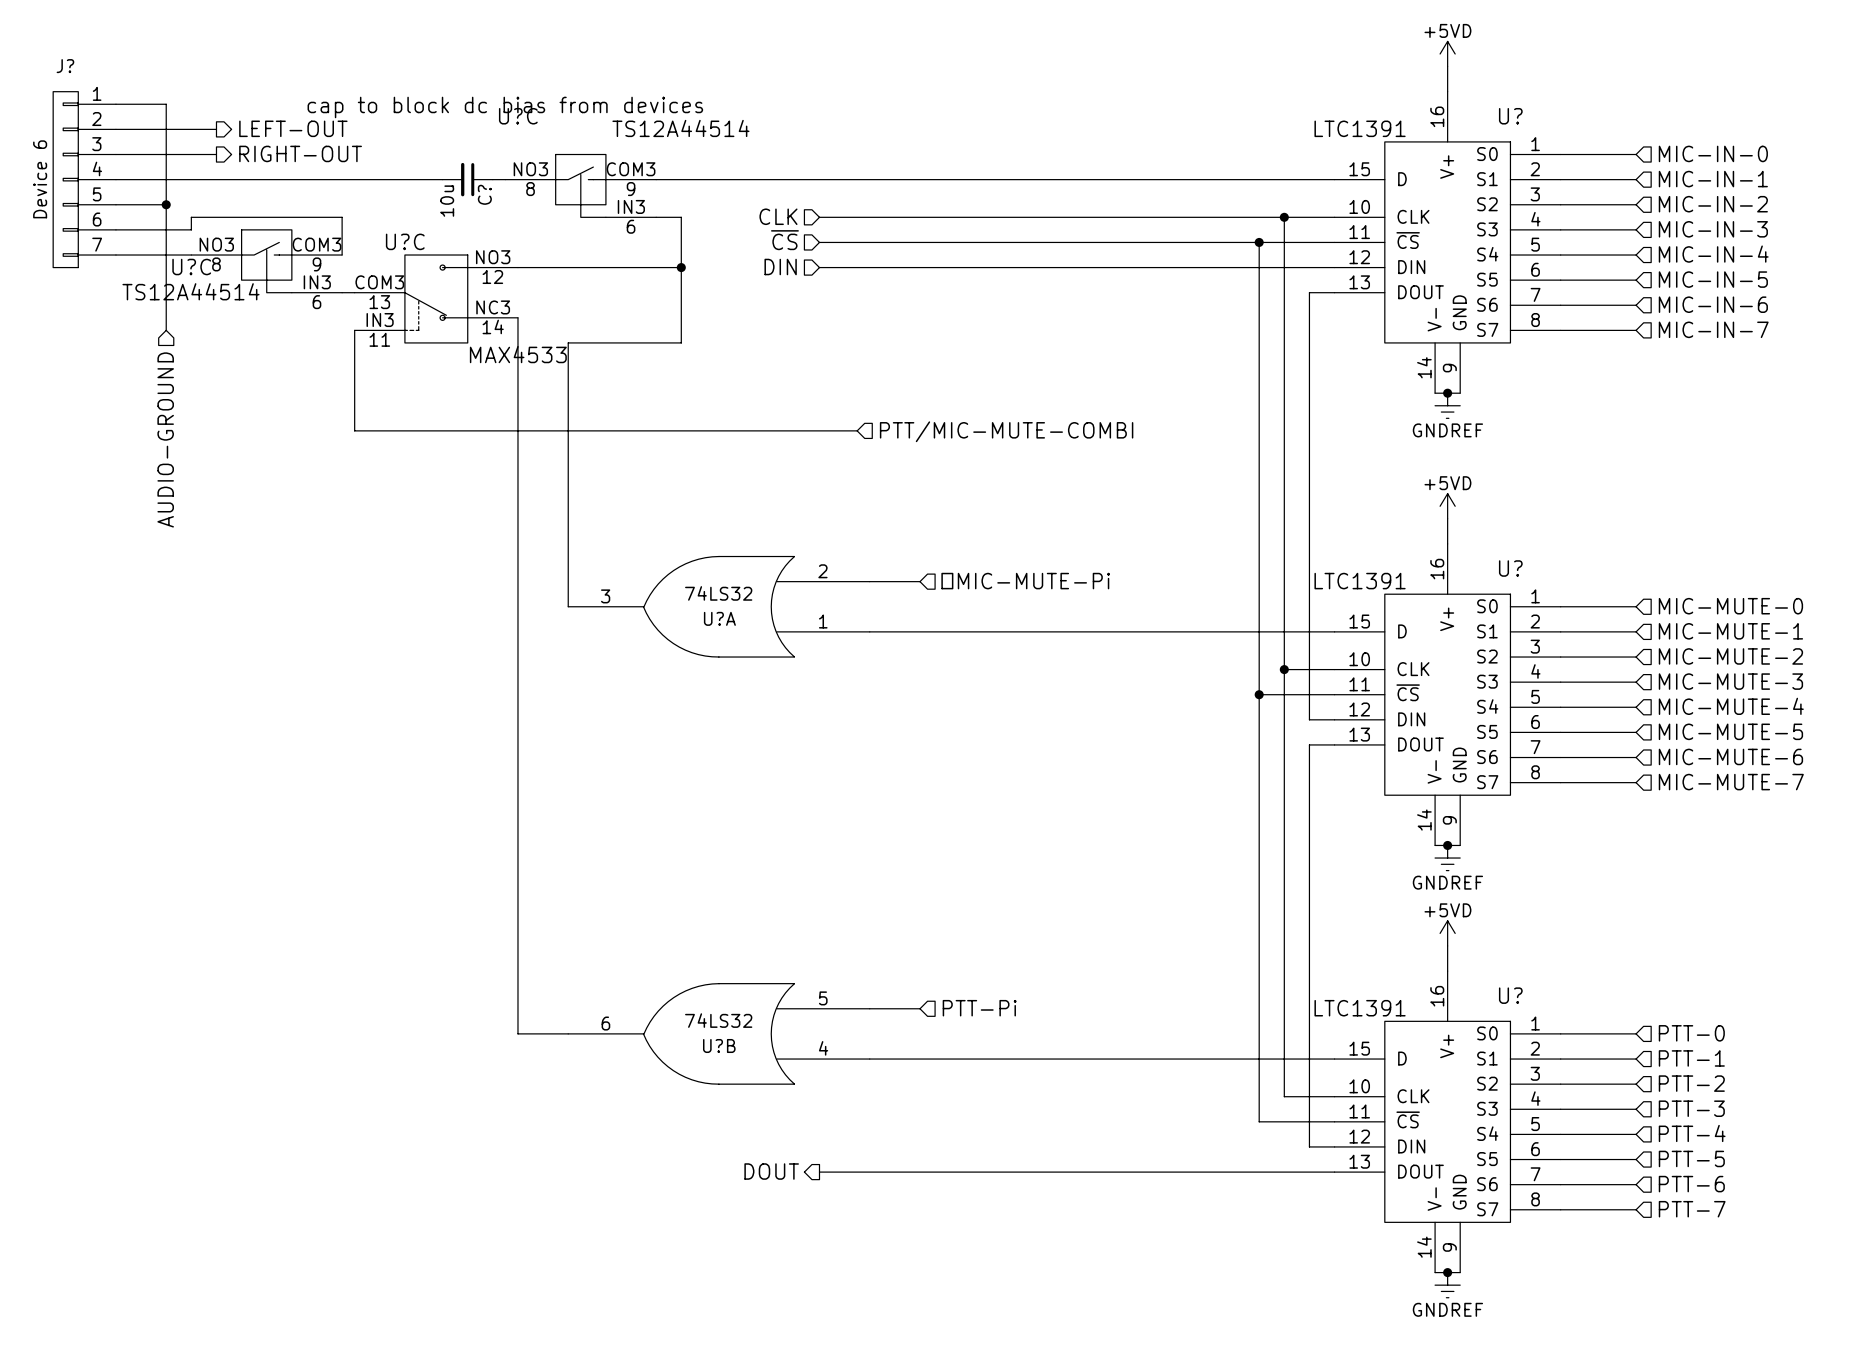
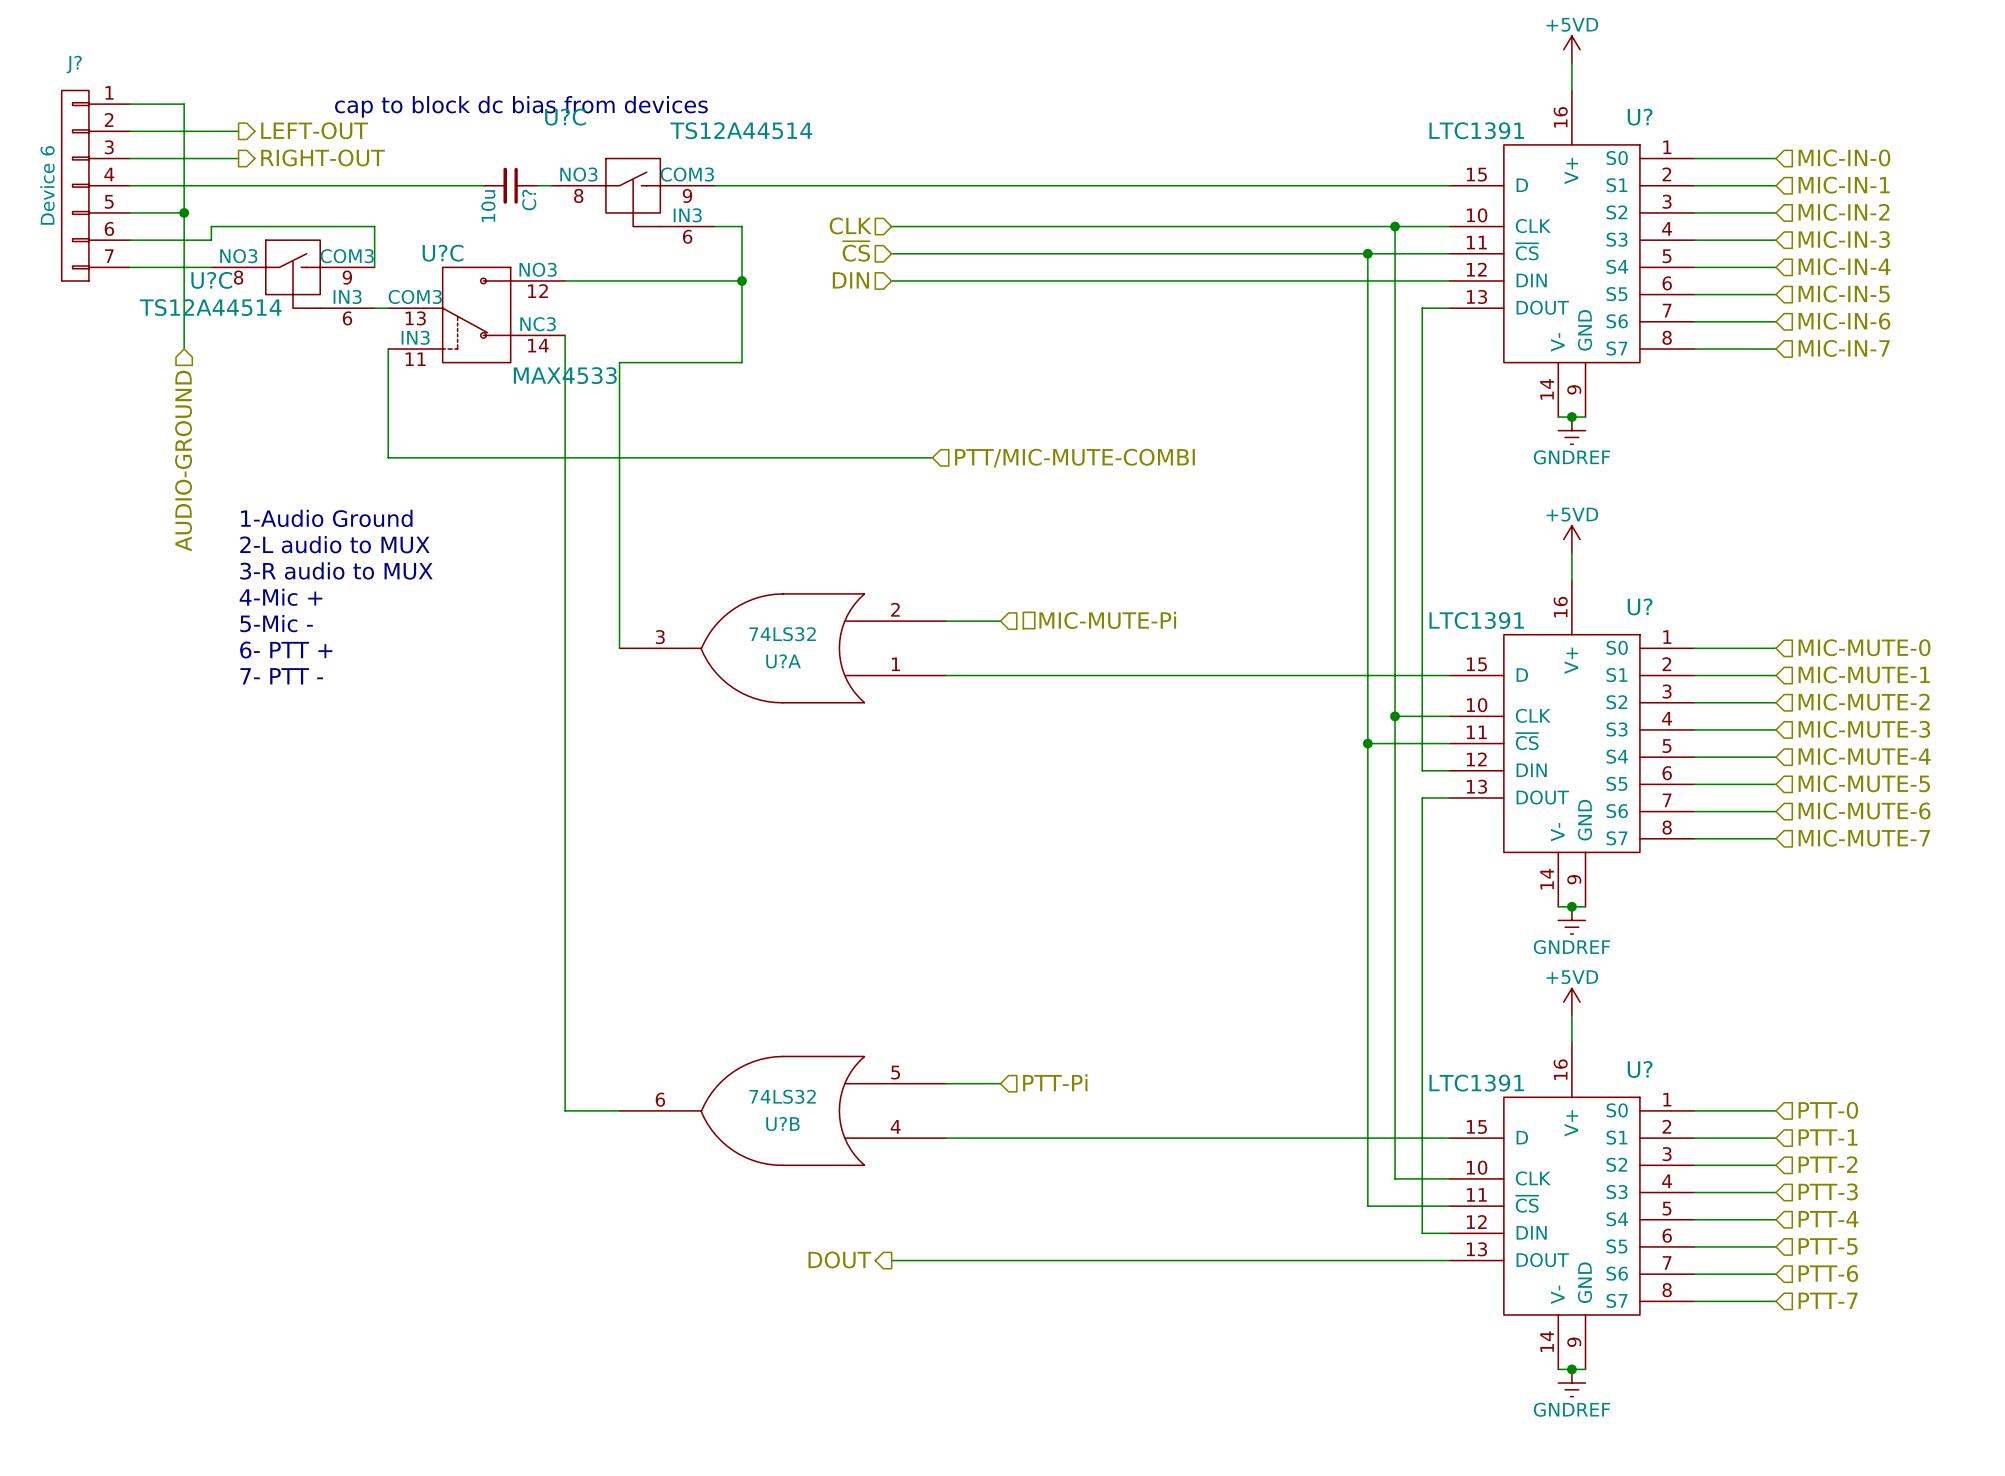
text: none -> 1-Audio Ground (326, 518)
text: none -> 2-L audio to MUX (334, 544)
text: none -> 3-R audio to MUX (336, 570)
text: none -> 4-Mic + (280, 597)
text: none -> 5-Mic - (276, 623)
text: none -> 6- PTT + (286, 650)
text: none -> 7- PTT - (281, 676)

